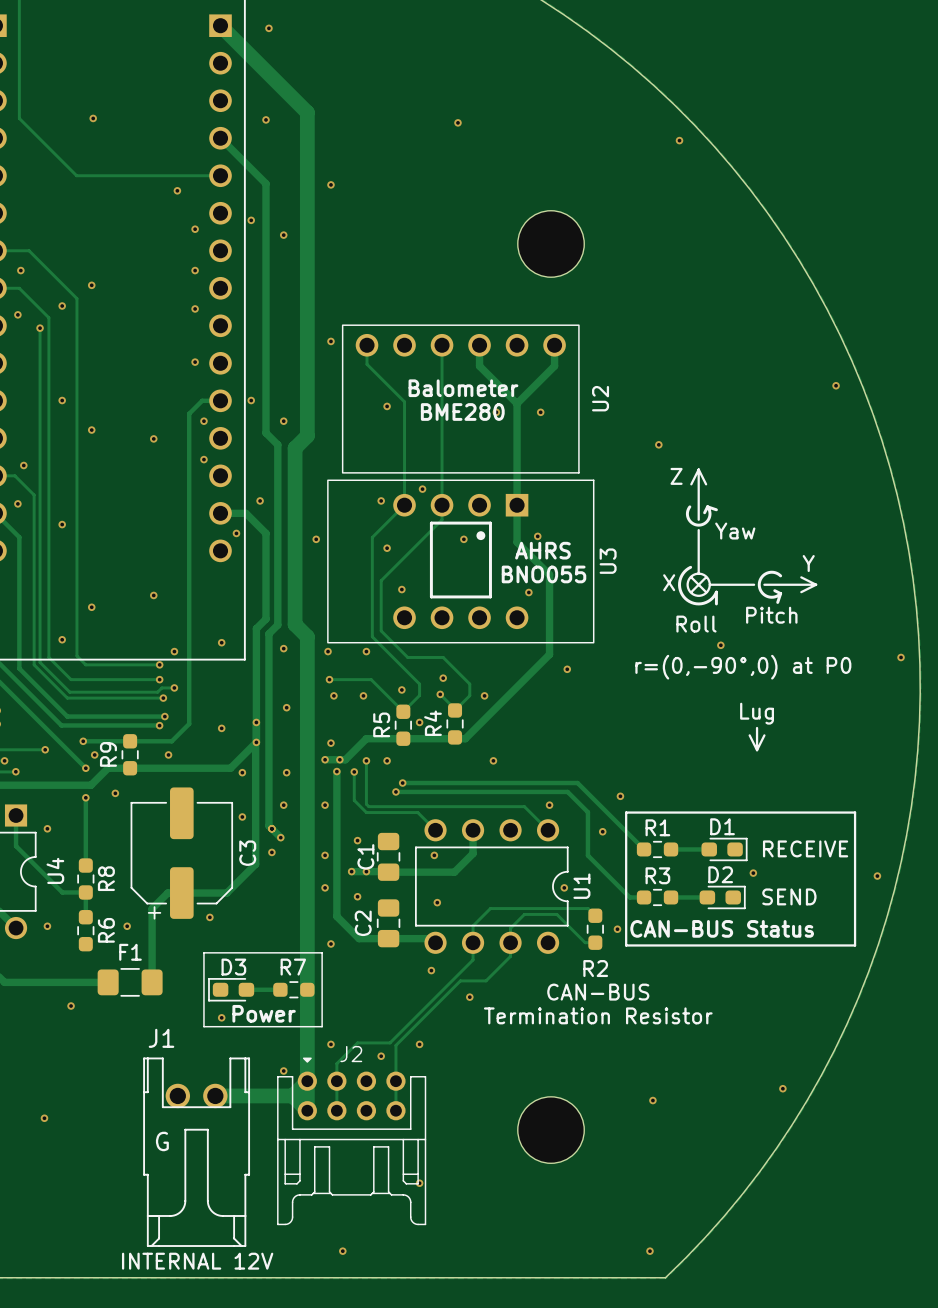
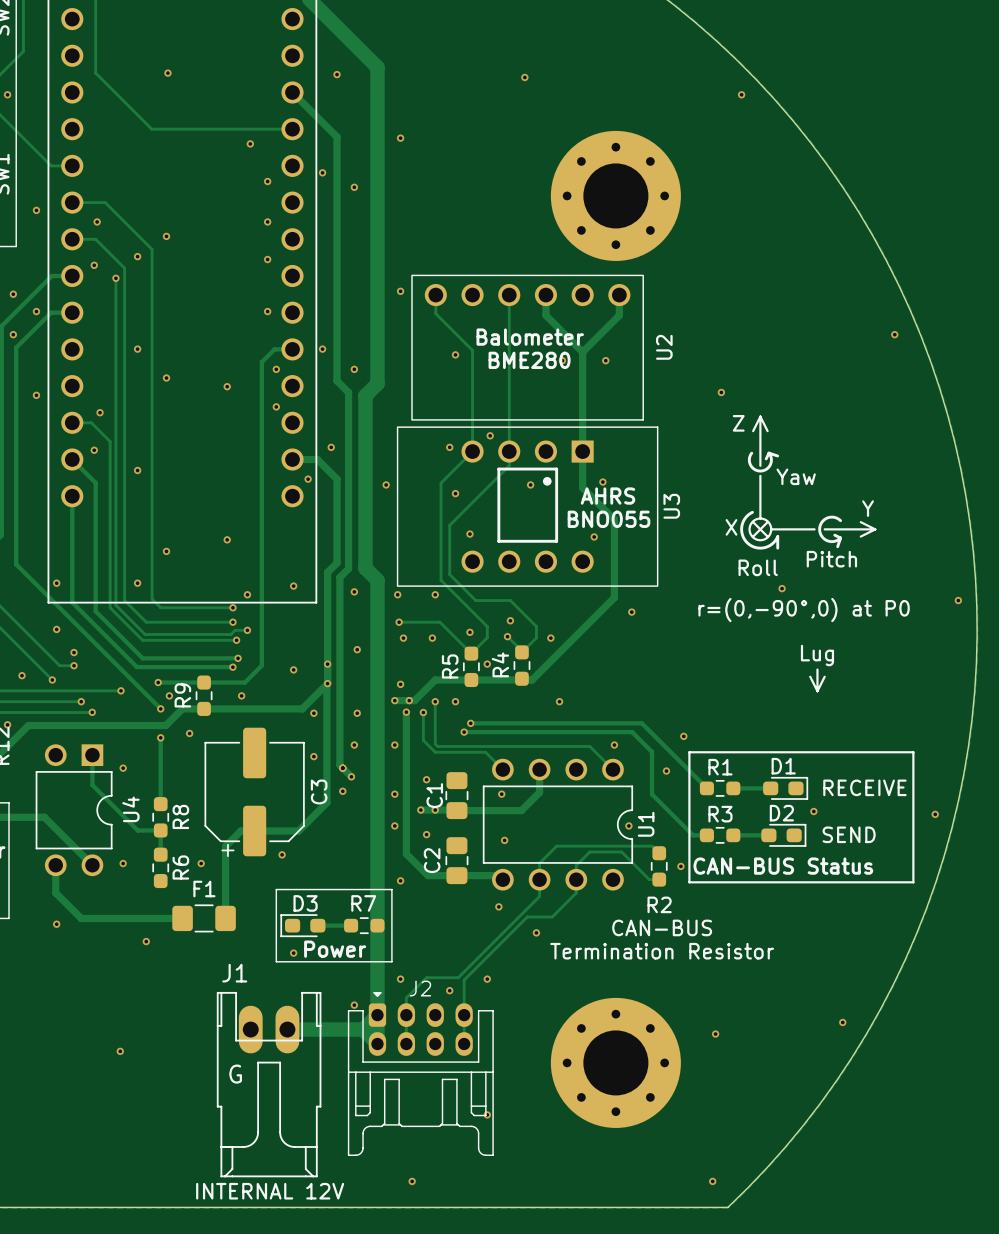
part footprint: [517, 210, 585, 278] -> [550, 130, 681, 261]
J1 footprint: [143, 1057, 251, 1247] -> [216, 991, 322, 1178]
J2 footprint: [277, 1057, 427, 1226] -> [347, 991, 494, 1156]
part footprint: [517, 1096, 585, 1164] -> [550, 997, 681, 1128]

